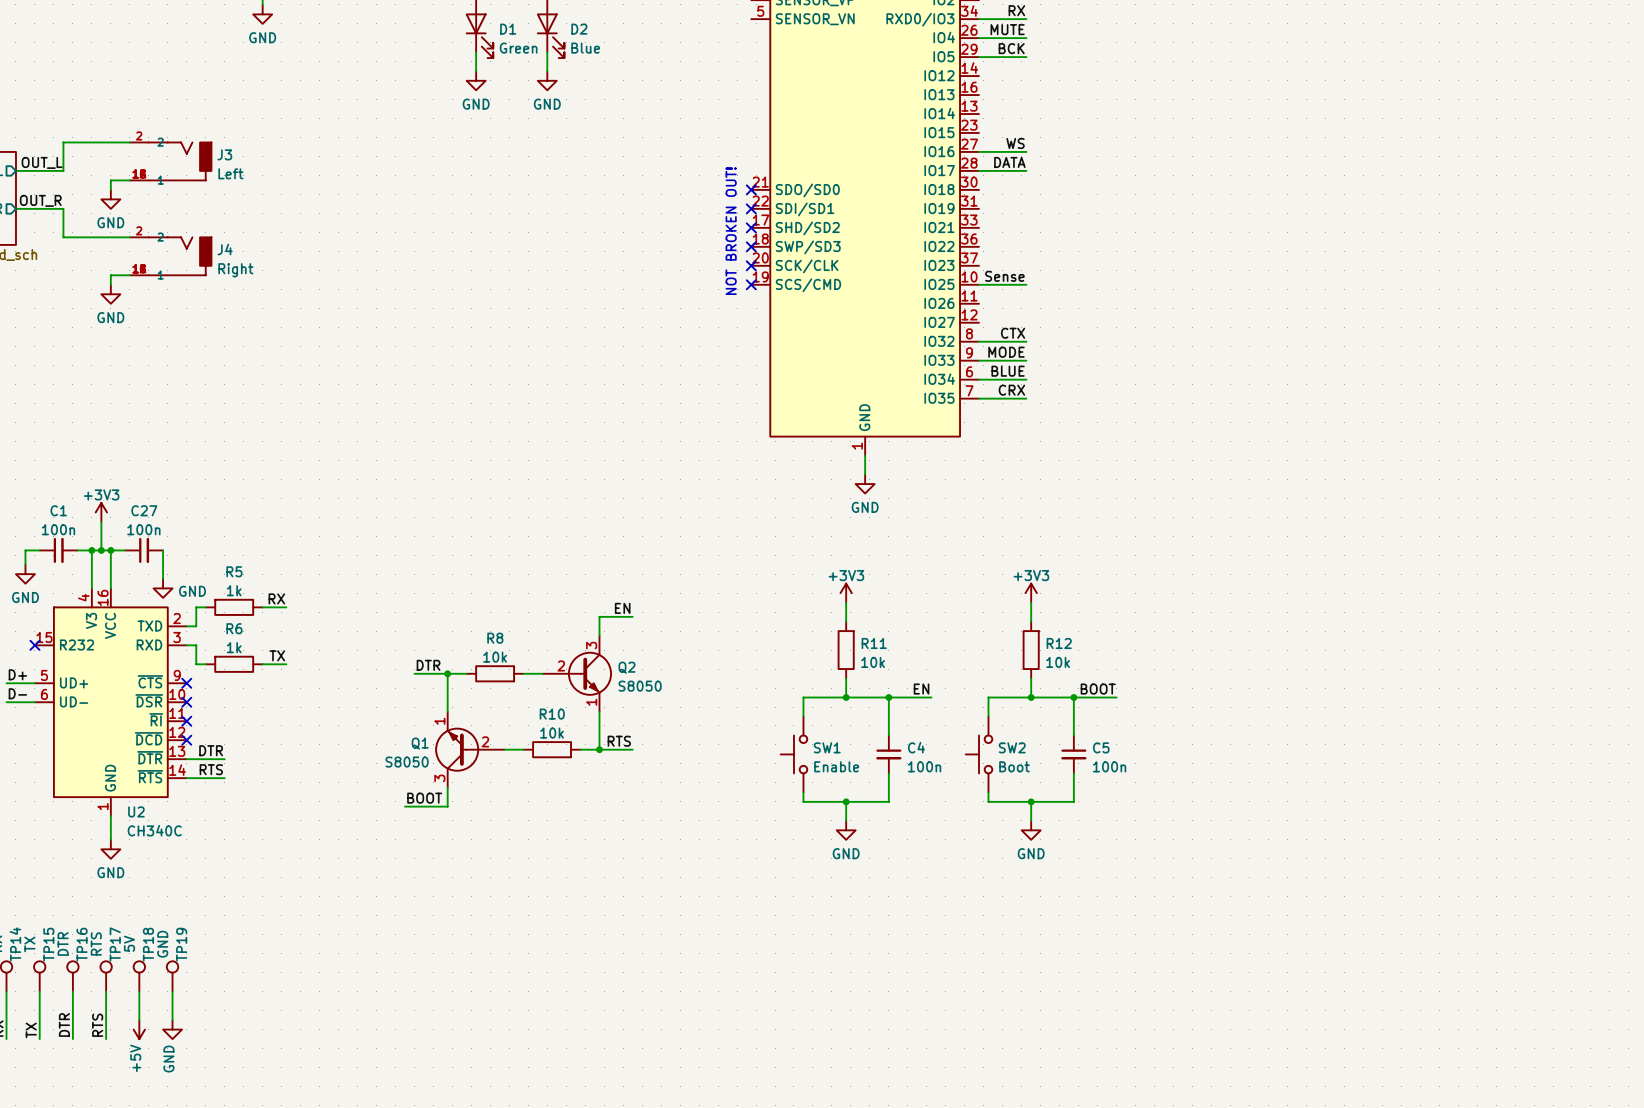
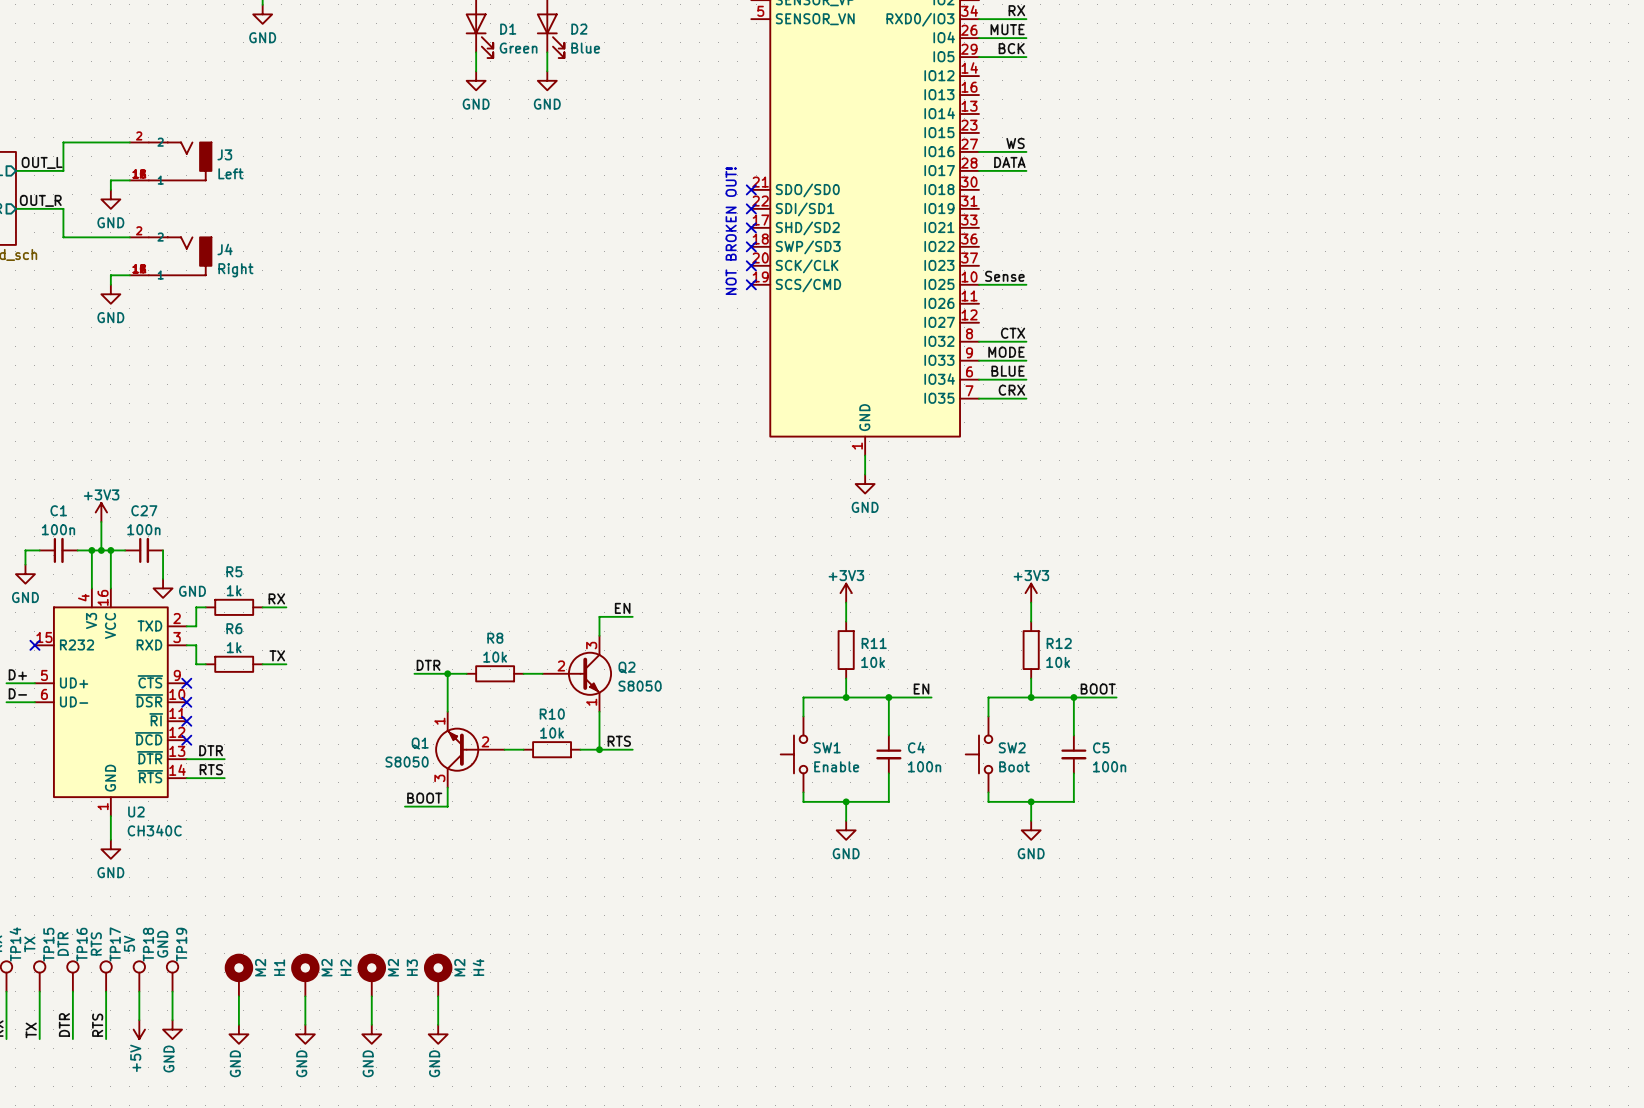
H1: none -> M2 (238, 975)
H2: none -> M2 (305, 975)
H3: none -> M2 (371, 975)
H4: none -> M2 (438, 975)
wire: none -> (238, 996) (238, 1024)
wire: none -> (305, 996) (305, 1024)
wire: none -> (371, 996) (371, 1024)
wire: none -> (438, 996) (438, 1024)
power symbol: none -> GND (238, 1034)
power symbol: none -> GND (305, 1034)
power symbol: none -> GND (371, 1034)
power symbol: none -> GND (438, 1034)

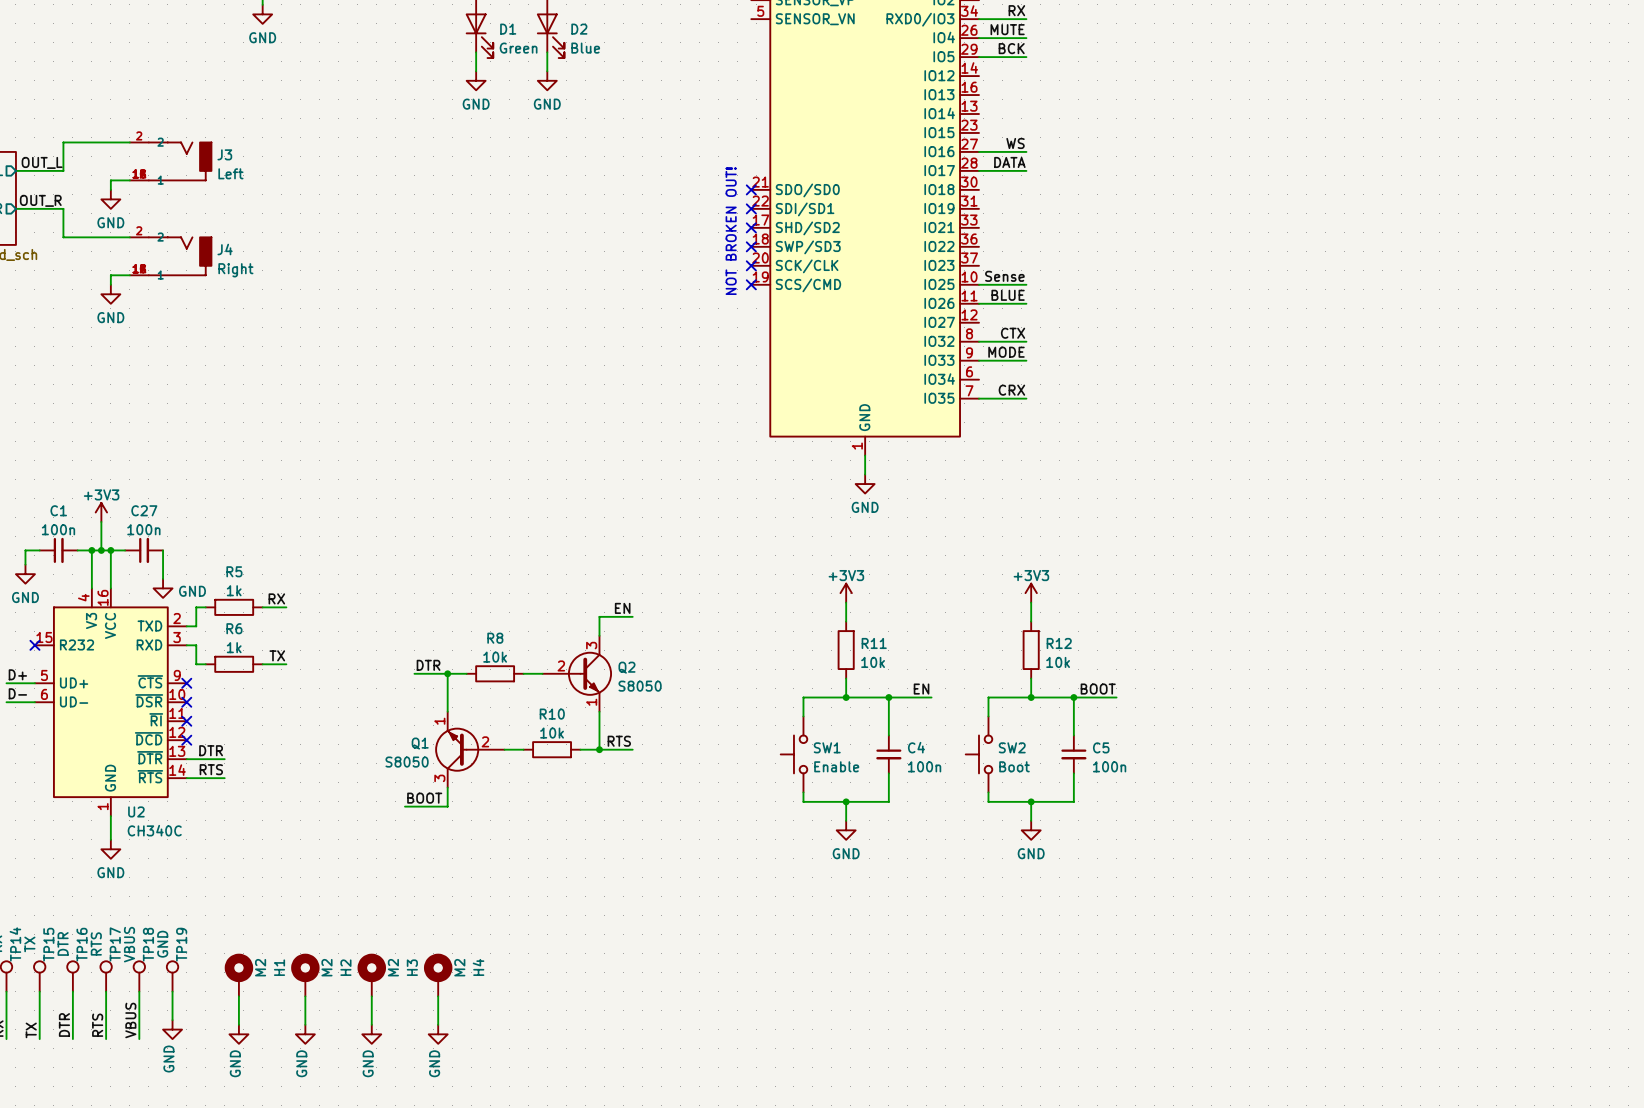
label position: BLUE (1008, 371) -> BLUE (1008, 295)
wire: (979, 379) (1026, 379) -> (979, 303) (1026, 303)
TP18 value: 5V (129, 943) -> VBUS (129, 944)
label: none -> VBUS (130, 1020)
power symbol: +5V (139, 1029) -> none

